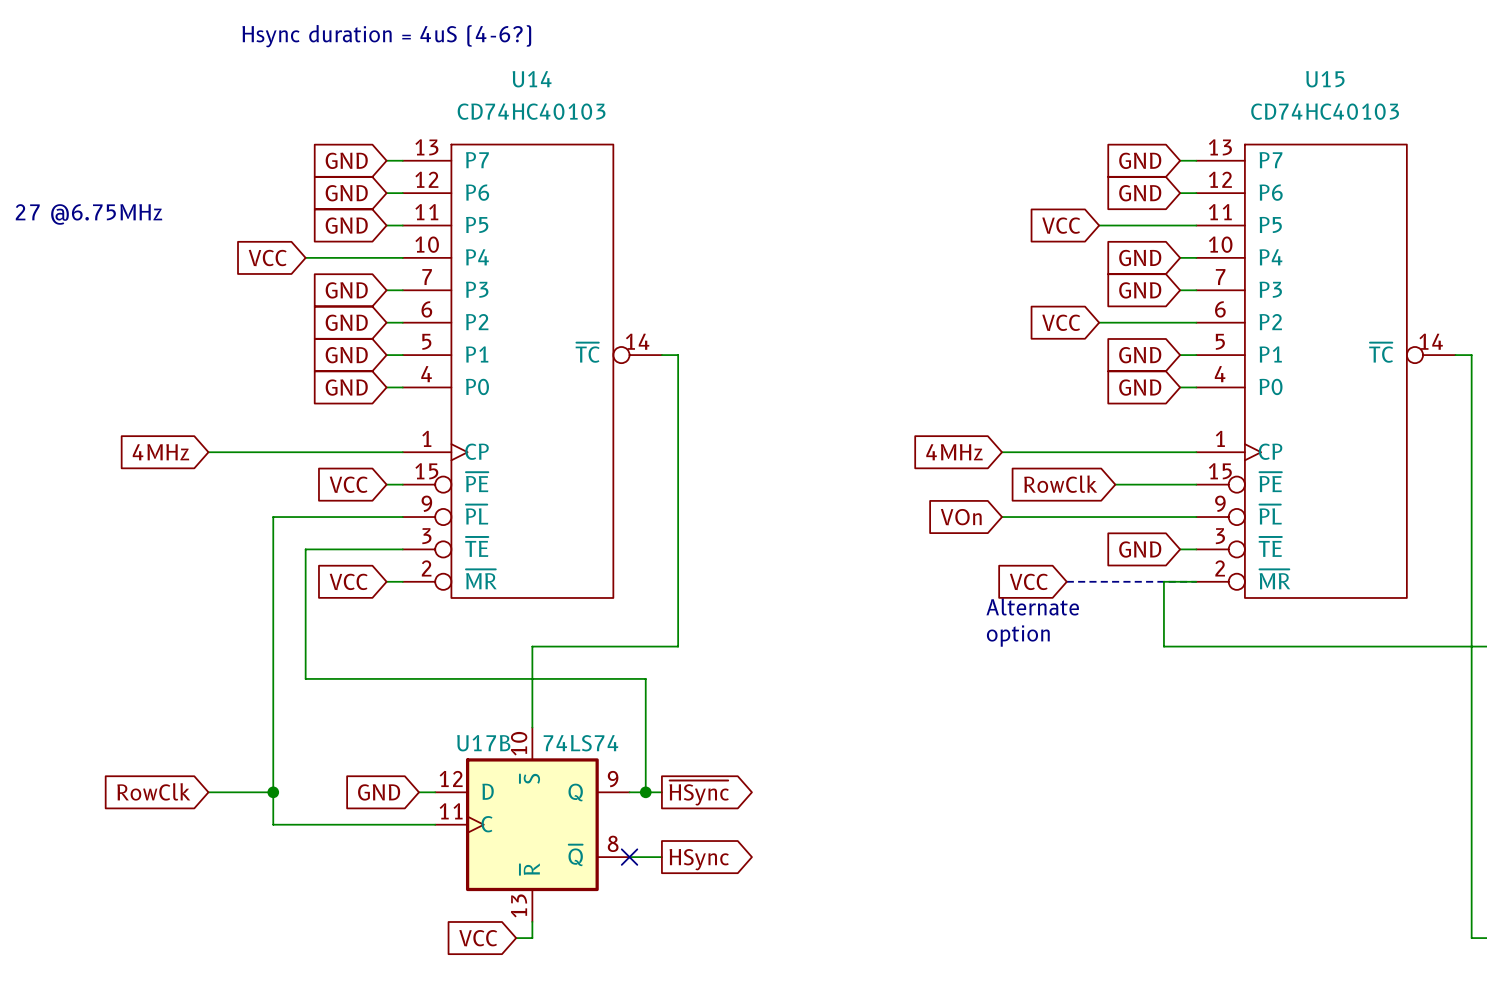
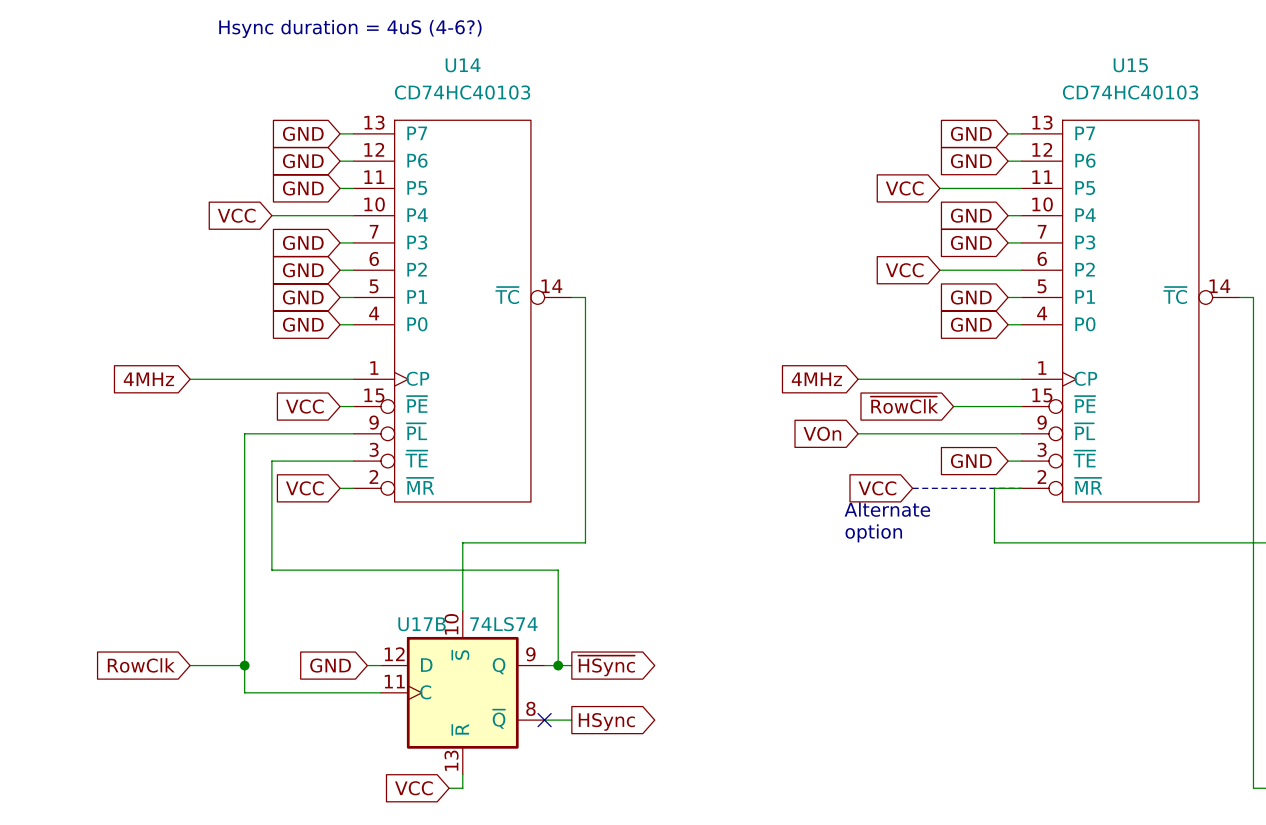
text: 27 @6.75MHz (89, 214) -> none
global label: RowClk (1060, 484) -> ~{RowClk} (904, 405)

